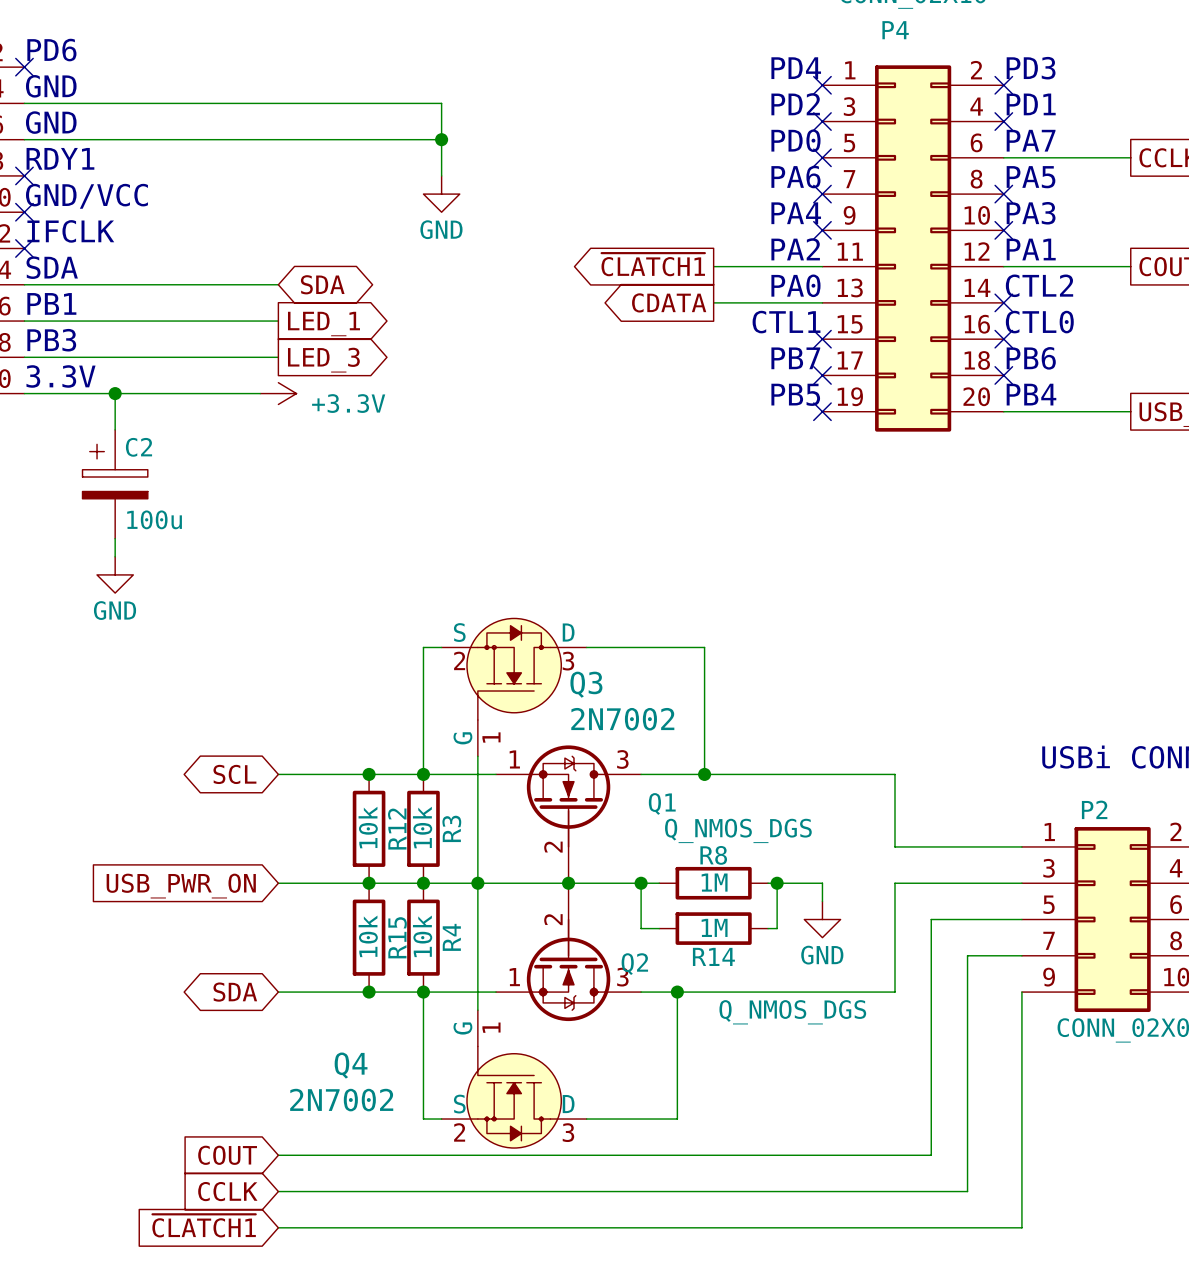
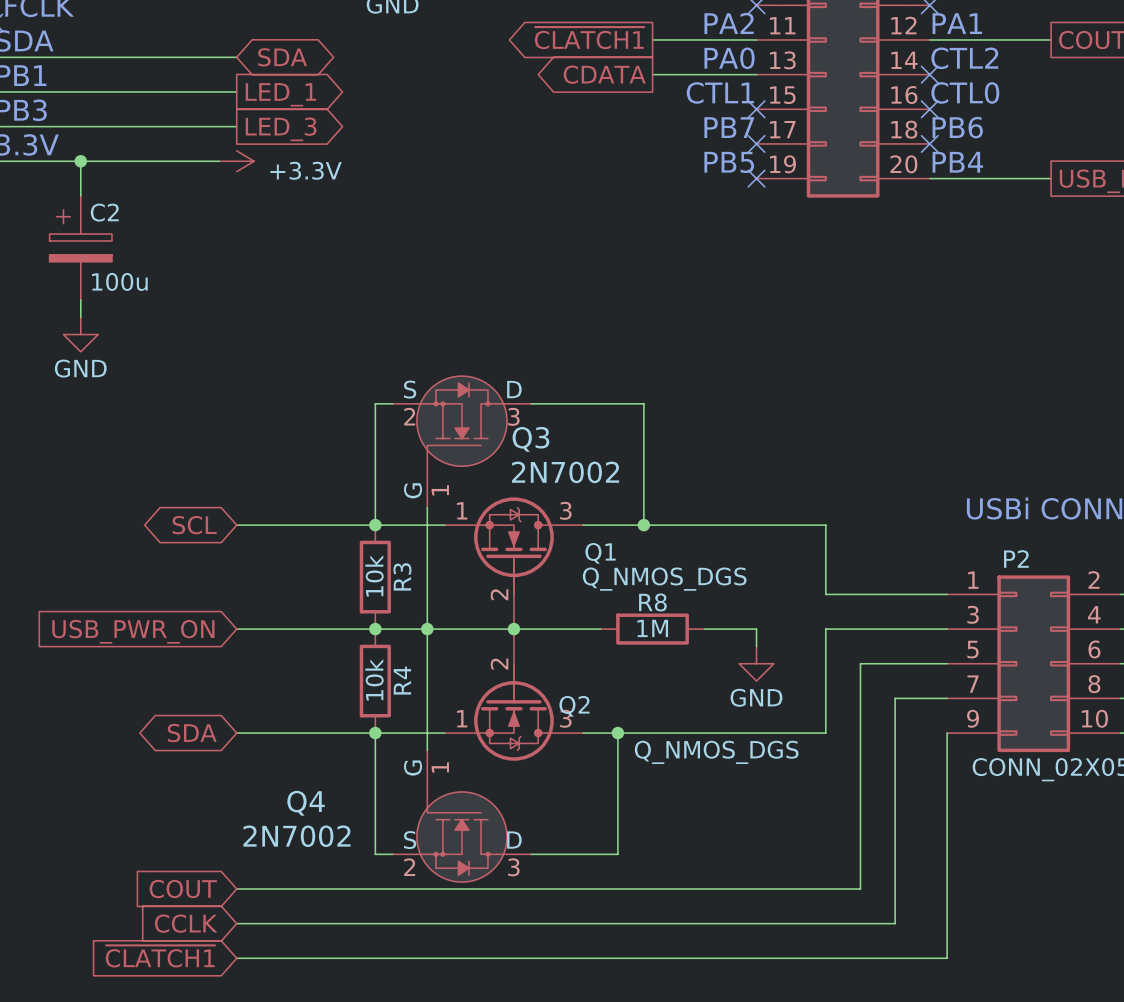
junction: (369, 774) -> none
R12: 10k (369, 828) -> none
junction: (369, 883) -> none
wire: (641, 883) (641, 928) (659, 928) -> none
junction: (641, 883) -> none
wire: (777, 883) (777, 928) (768, 928) -> none
junction: (777, 883) -> none
R14: 1M (713, 928) -> none
R15: 10k (369, 937) -> none
junction: (369, 992) -> none

